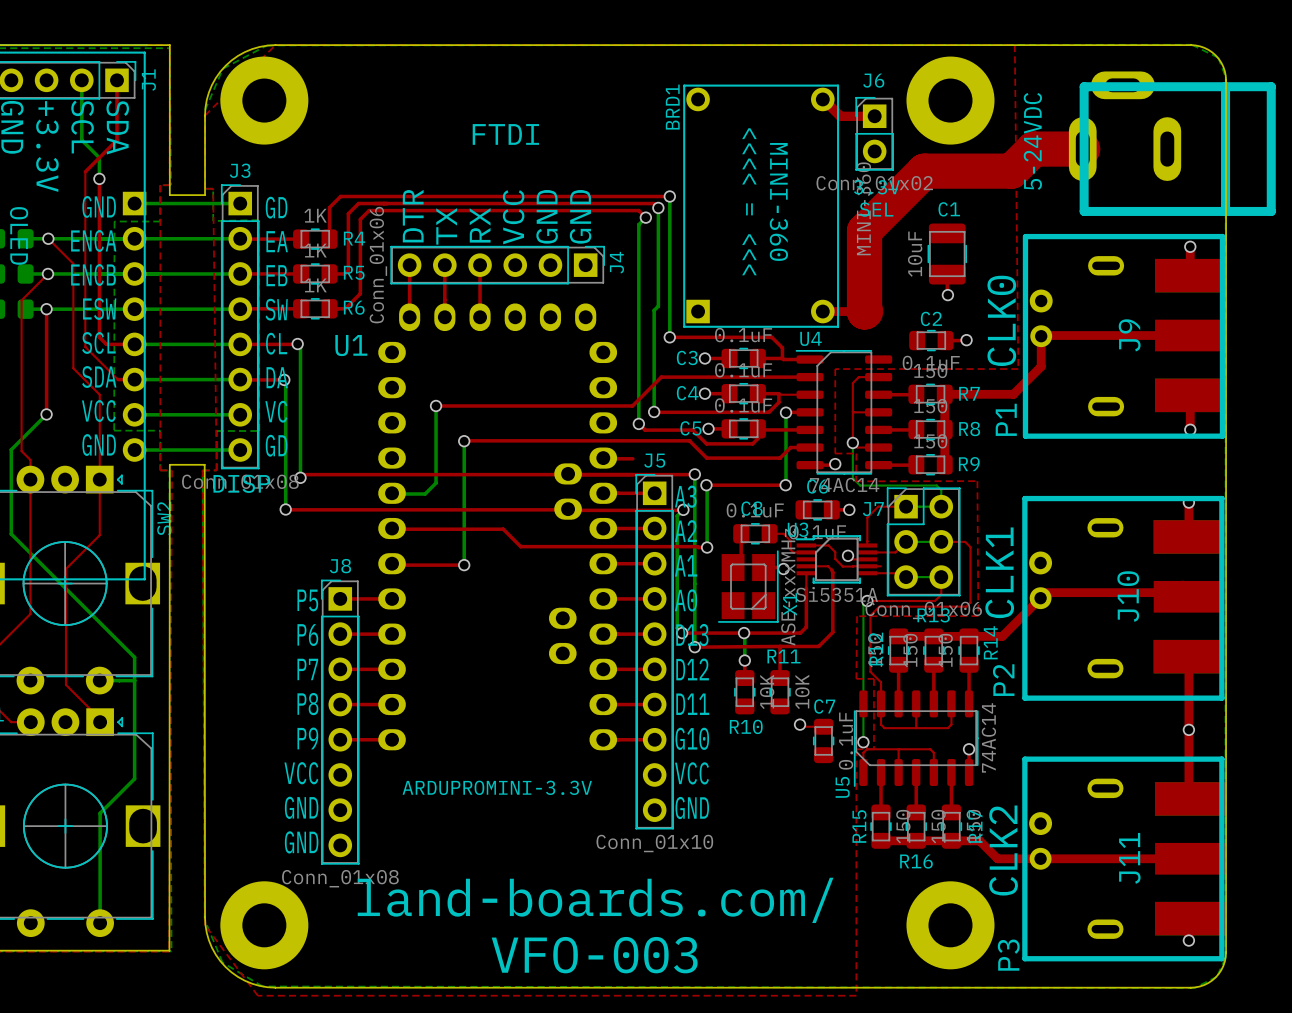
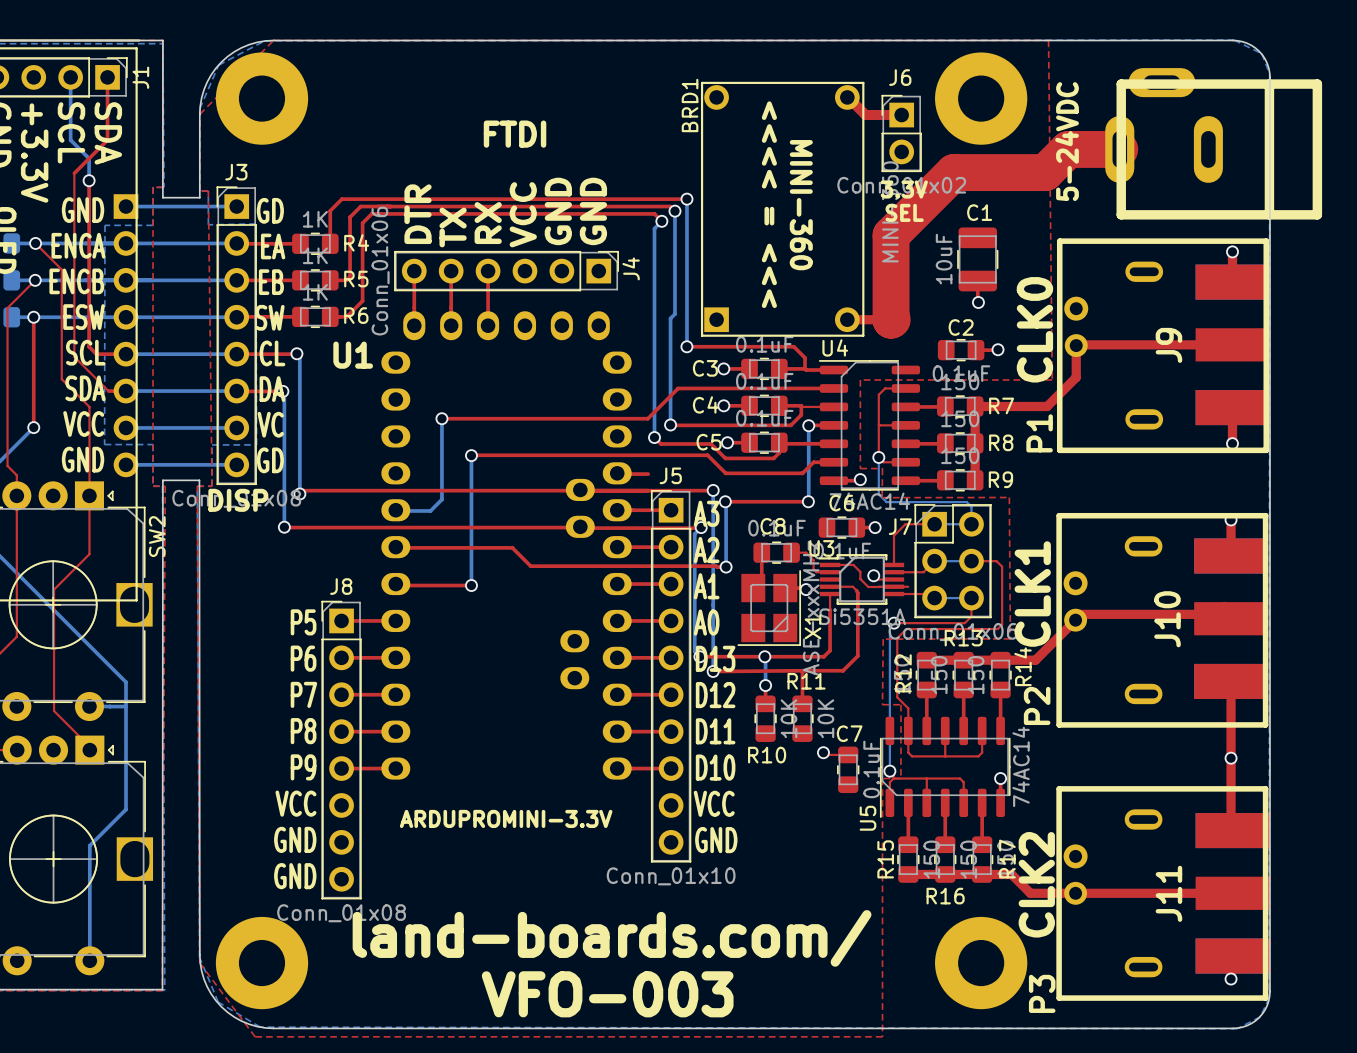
text: G10 (692, 738) -> D10 (715, 767)

